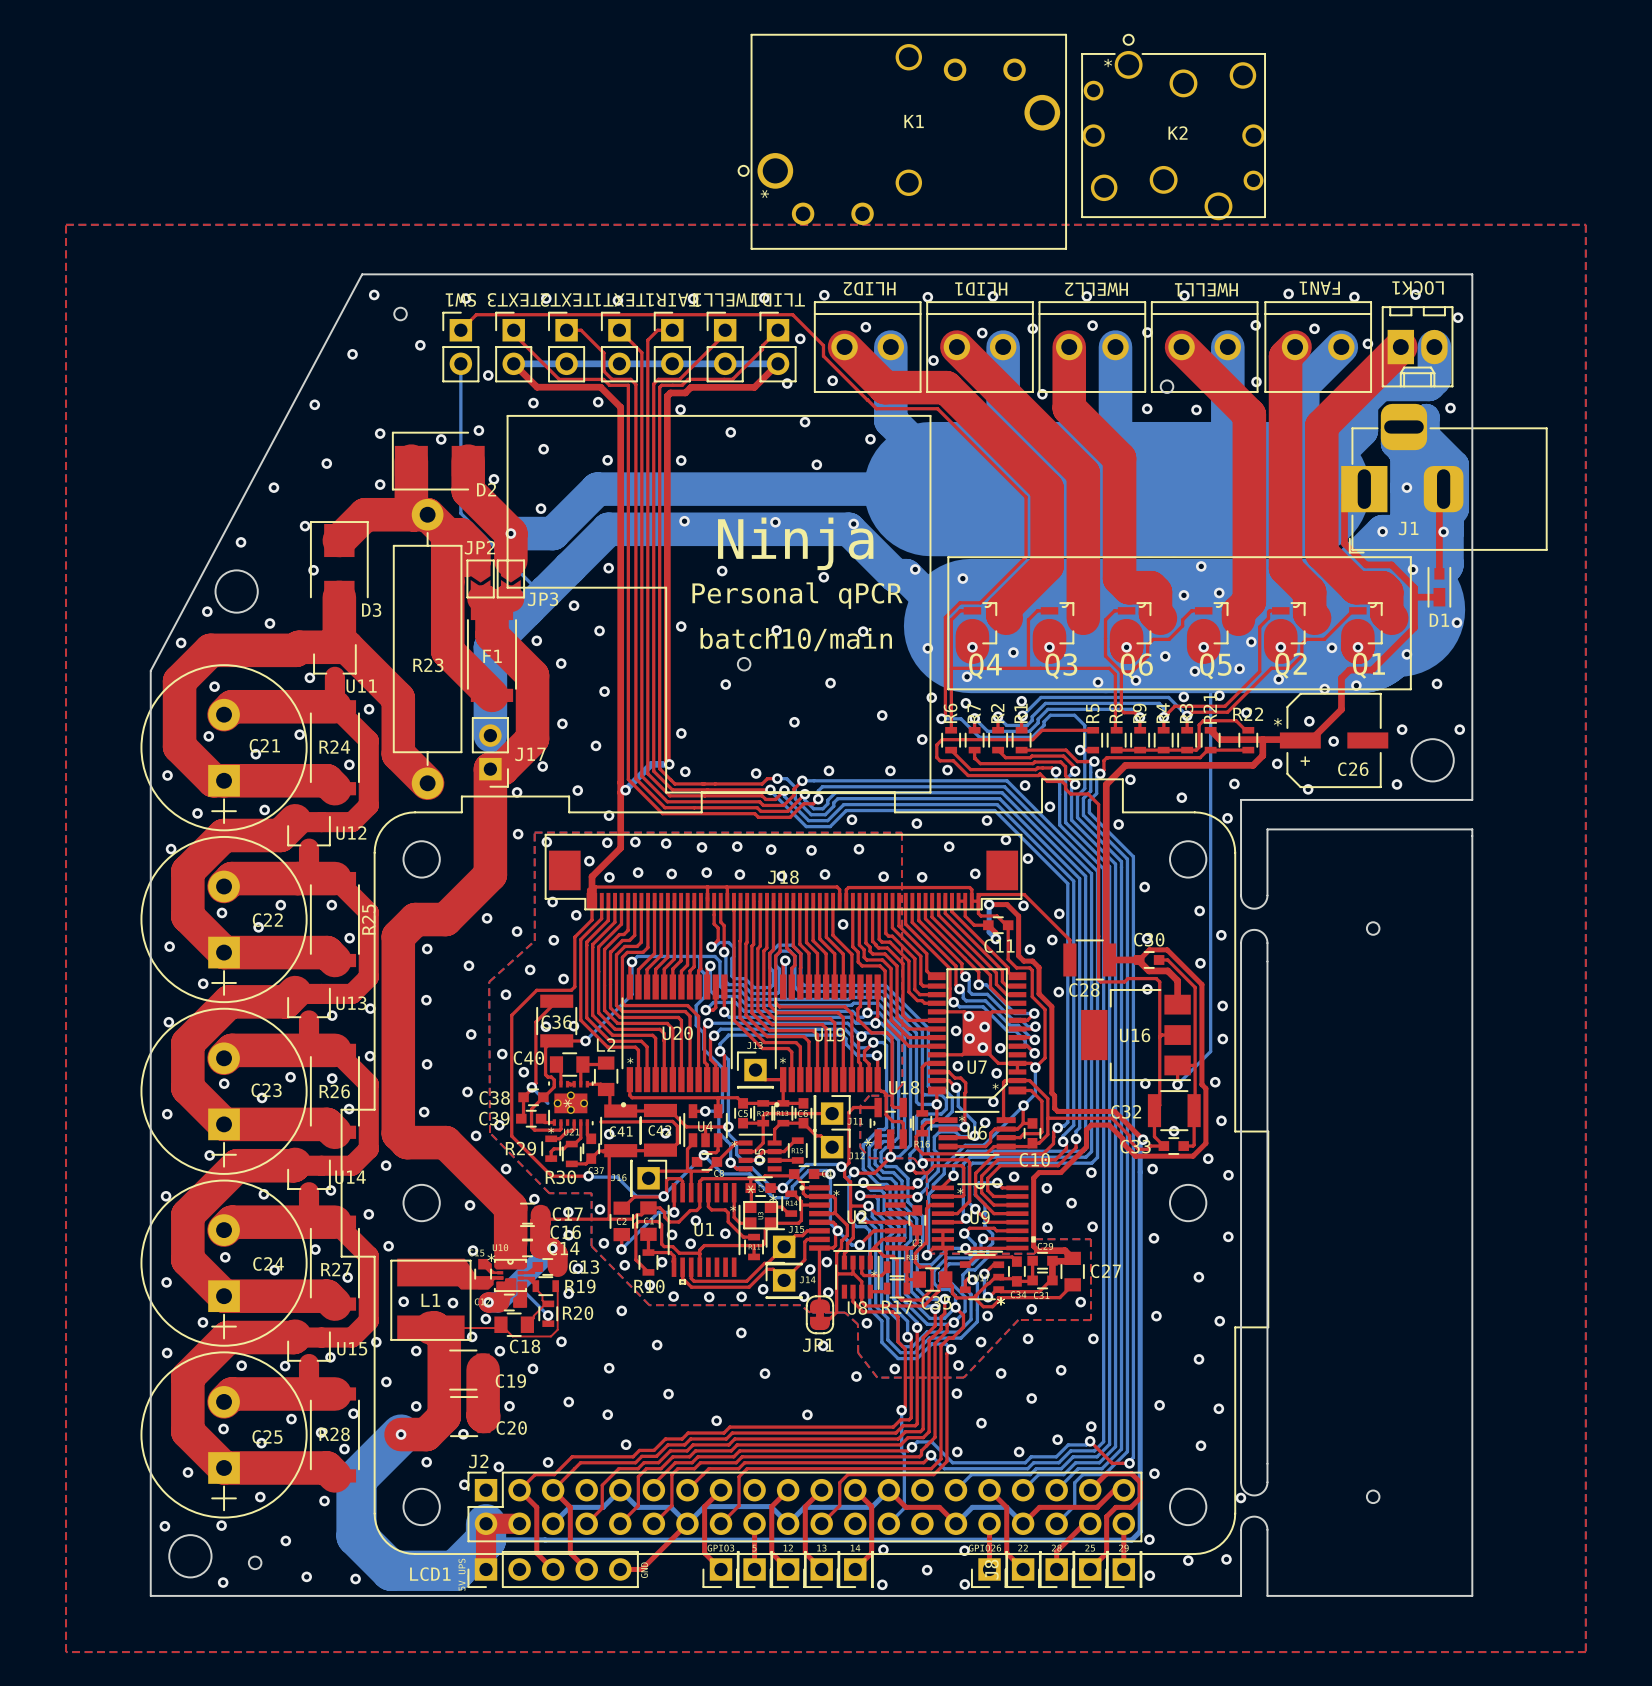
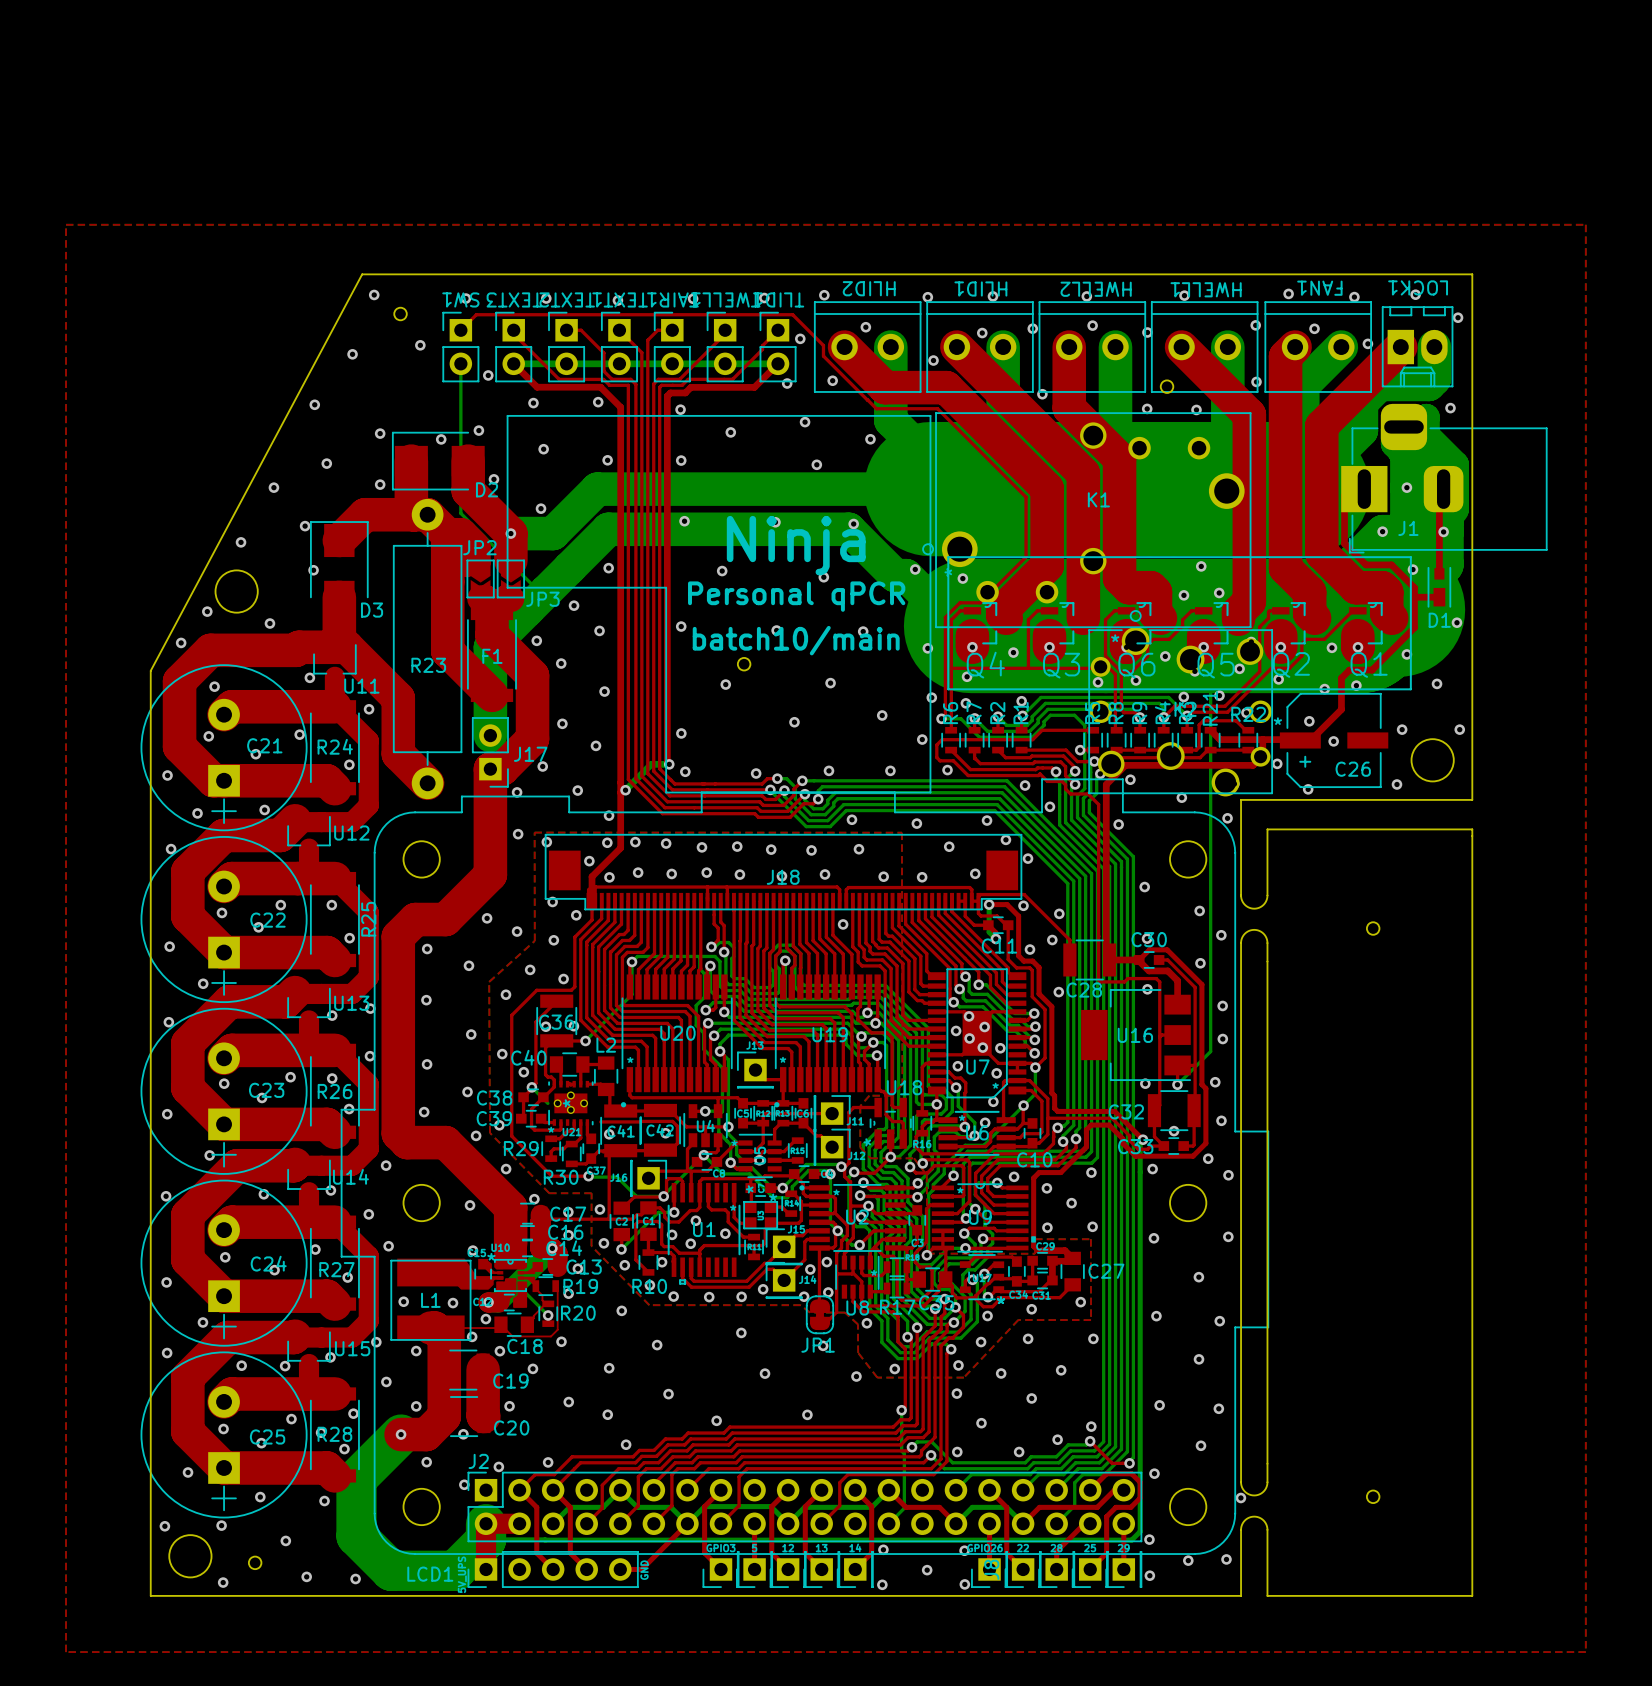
K2 position: (1173, 127) -> (1180, 703)
K1 position: (902, 141) -> (1086, 520)

